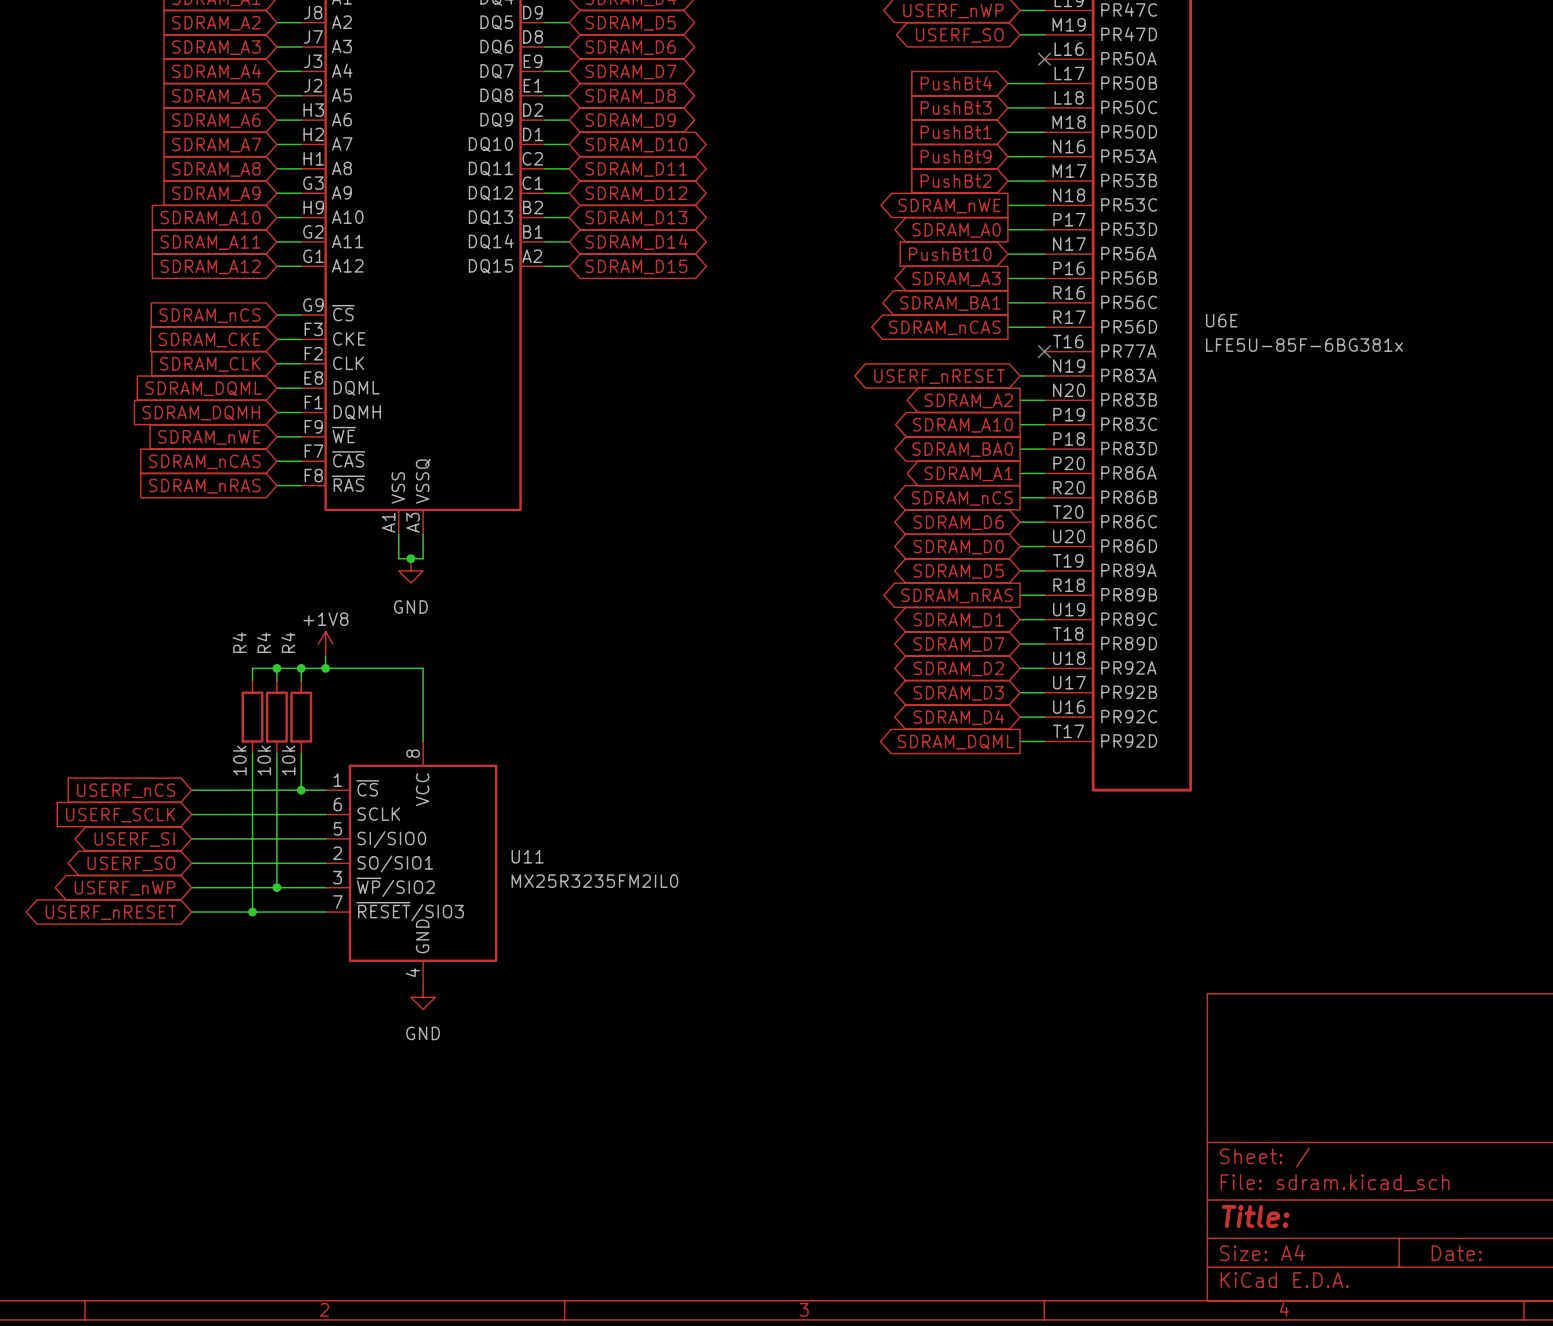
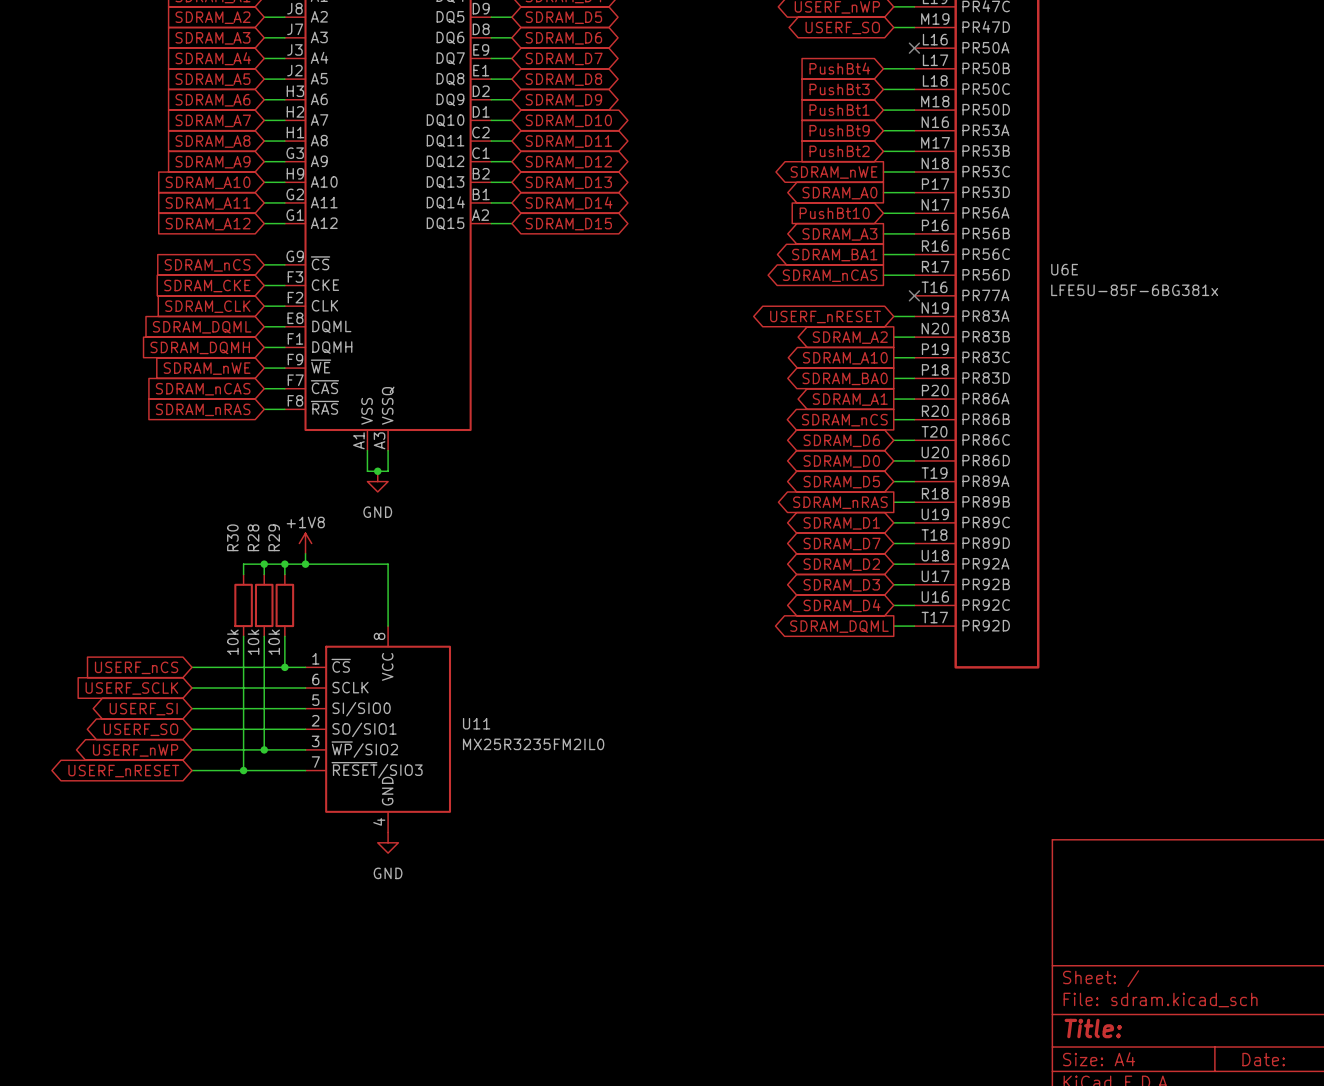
R4 name: R4 (239, 642) -> R30 (232, 537)
R4 name: R4 (263, 642) -> R28 (253, 537)
R4 name: R4 (288, 642) -> R29 (274, 537)

